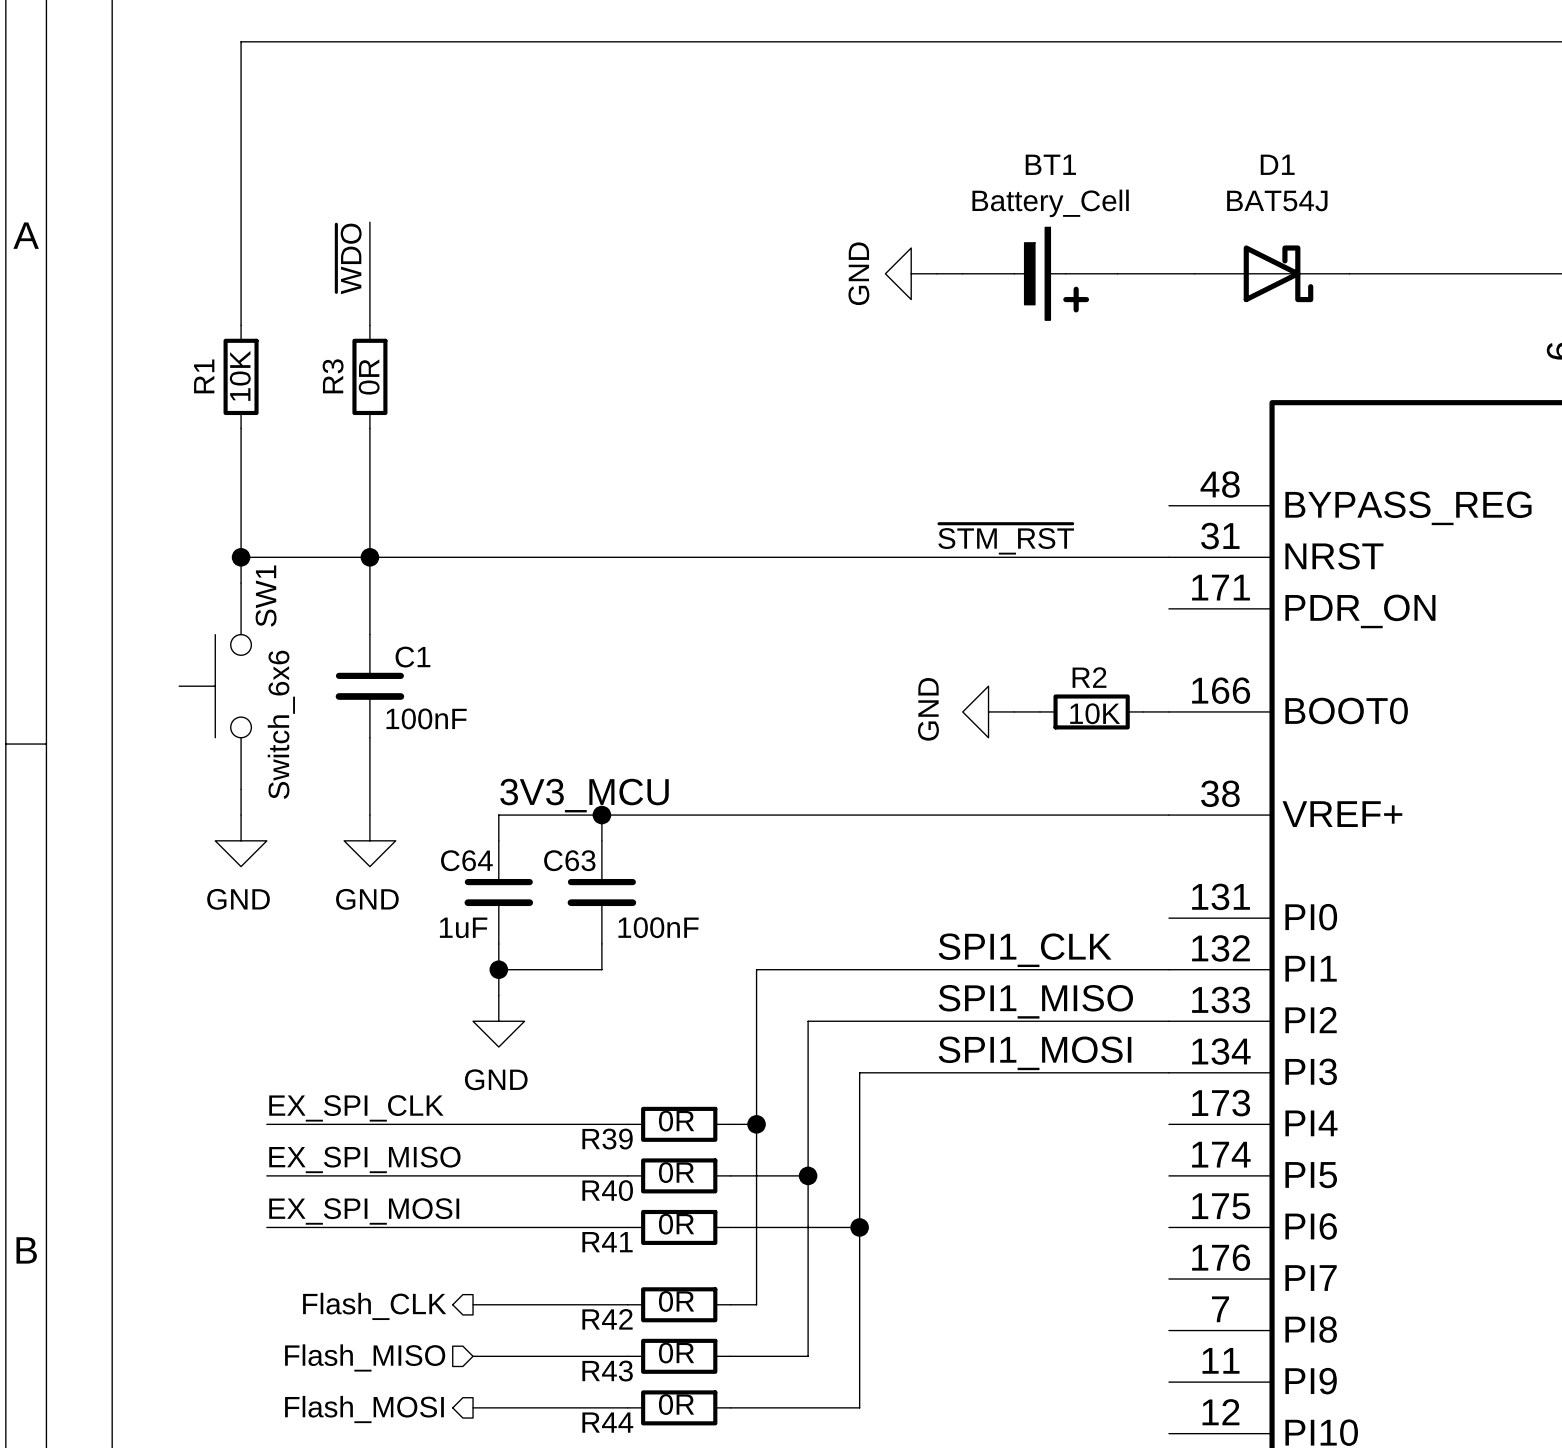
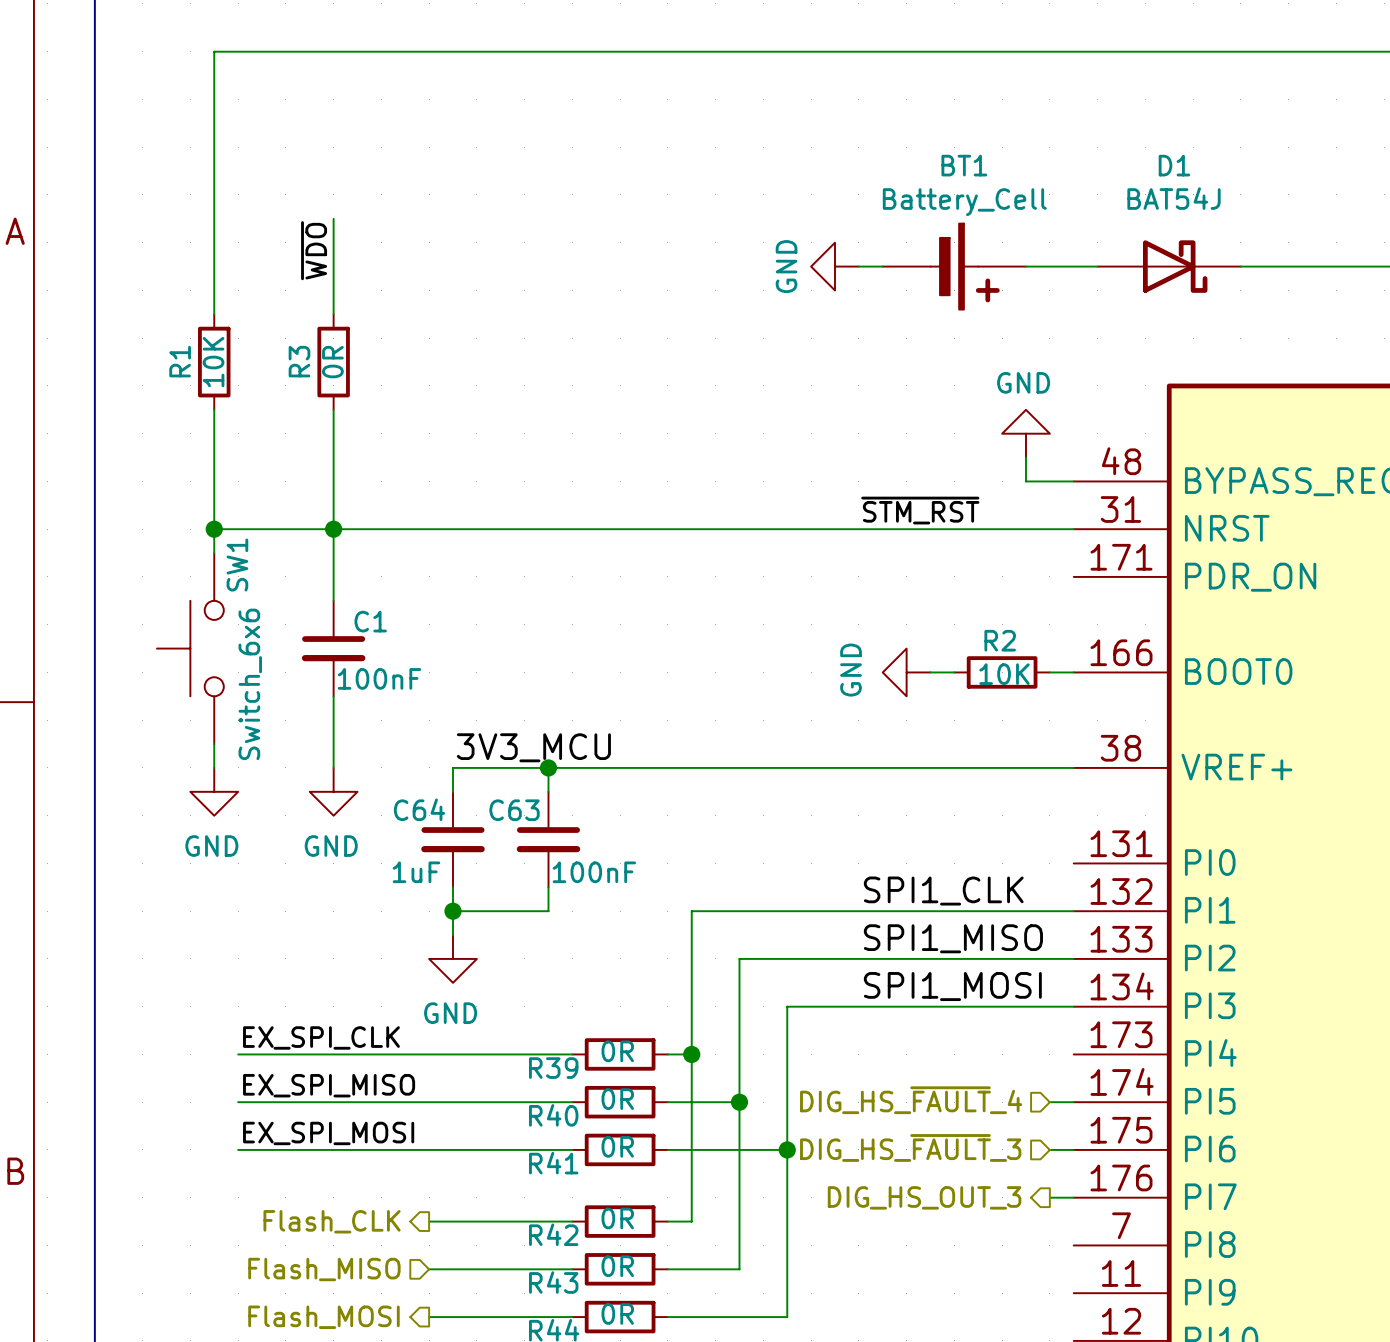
power symbol: none -> GND (1025, 433)
wire: none -> (1025, 457) (1025, 481) (1073, 481)
hierarchical label: none -> DIG_HS_~{FAULT}_4 (911, 1100)
wire: none -> (1049, 1102) (1073, 1102)
hierarchical label: none -> DIG_HS_~{FAULT}_3 (910, 1147)
wire: none -> (1049, 1149) (1073, 1149)
wire: none -> (1049, 1197) (1073, 1197)
hierarchical label: none -> DIG_HS_OUT_3 (924, 1197)

